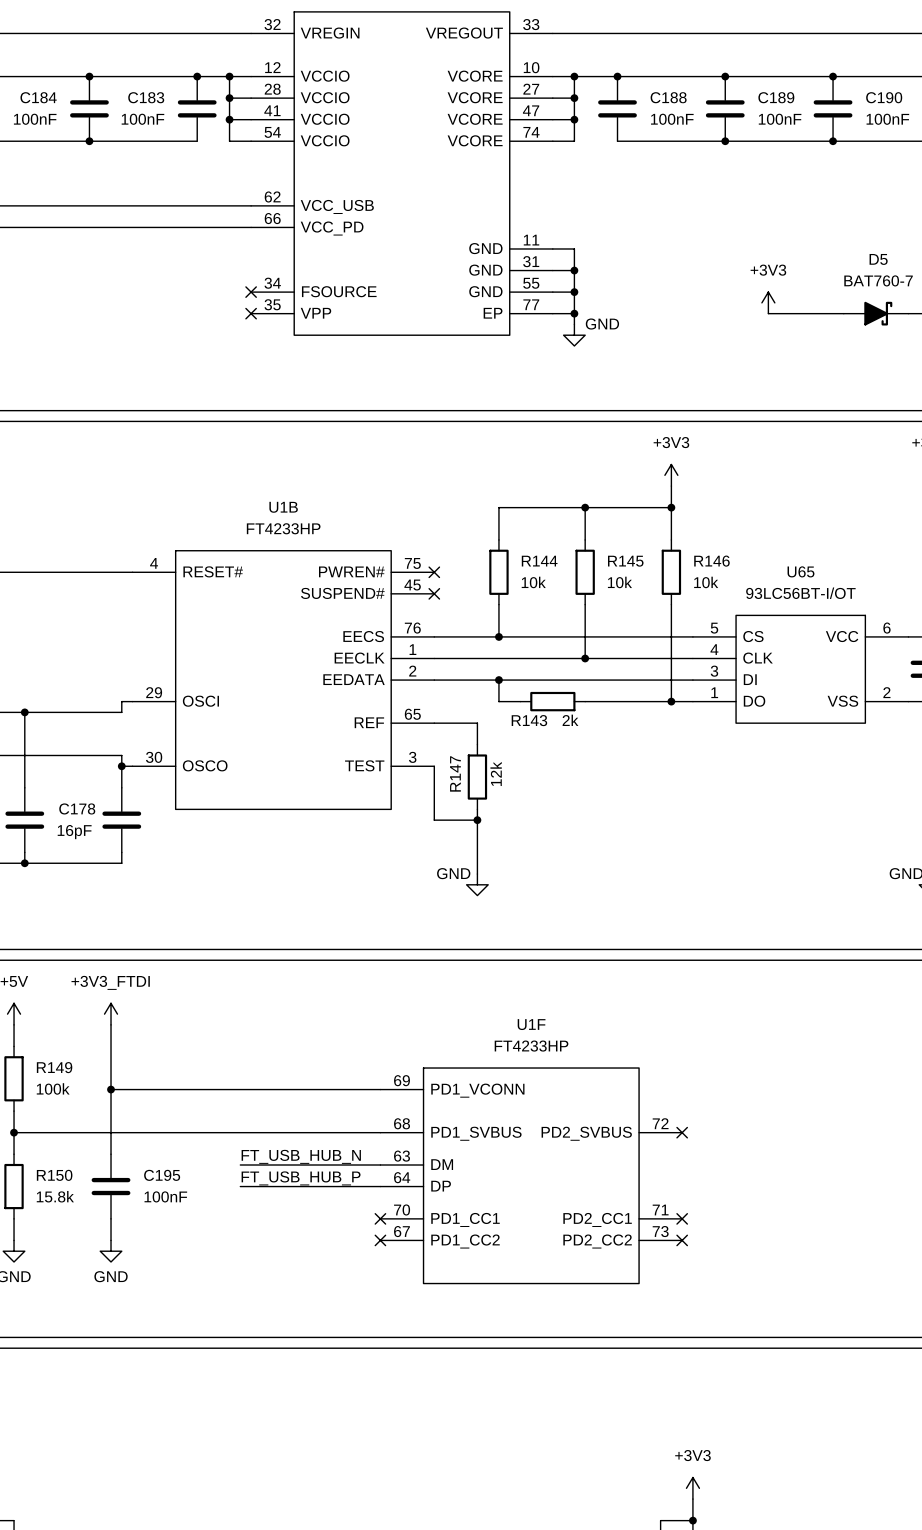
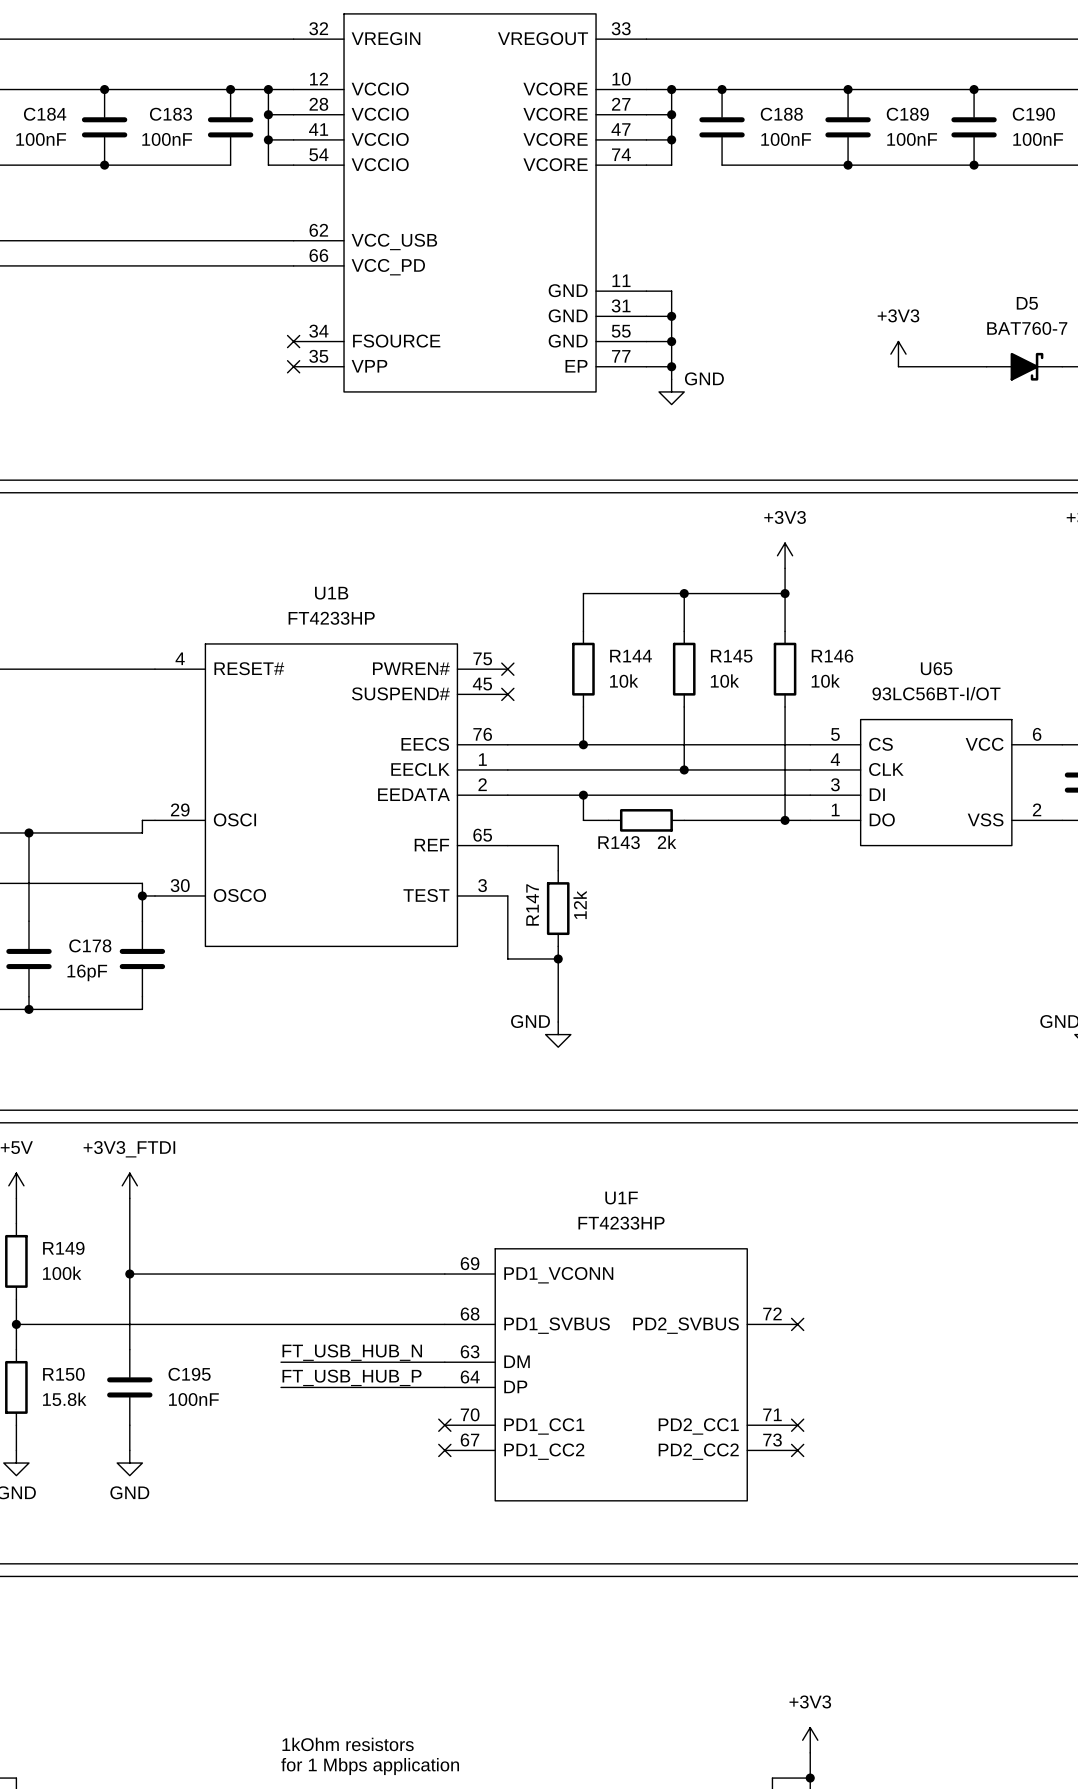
text: none -> 1kOhm resistors (348, 1744)
text: none -> for 1 Mbps application (370, 1766)

